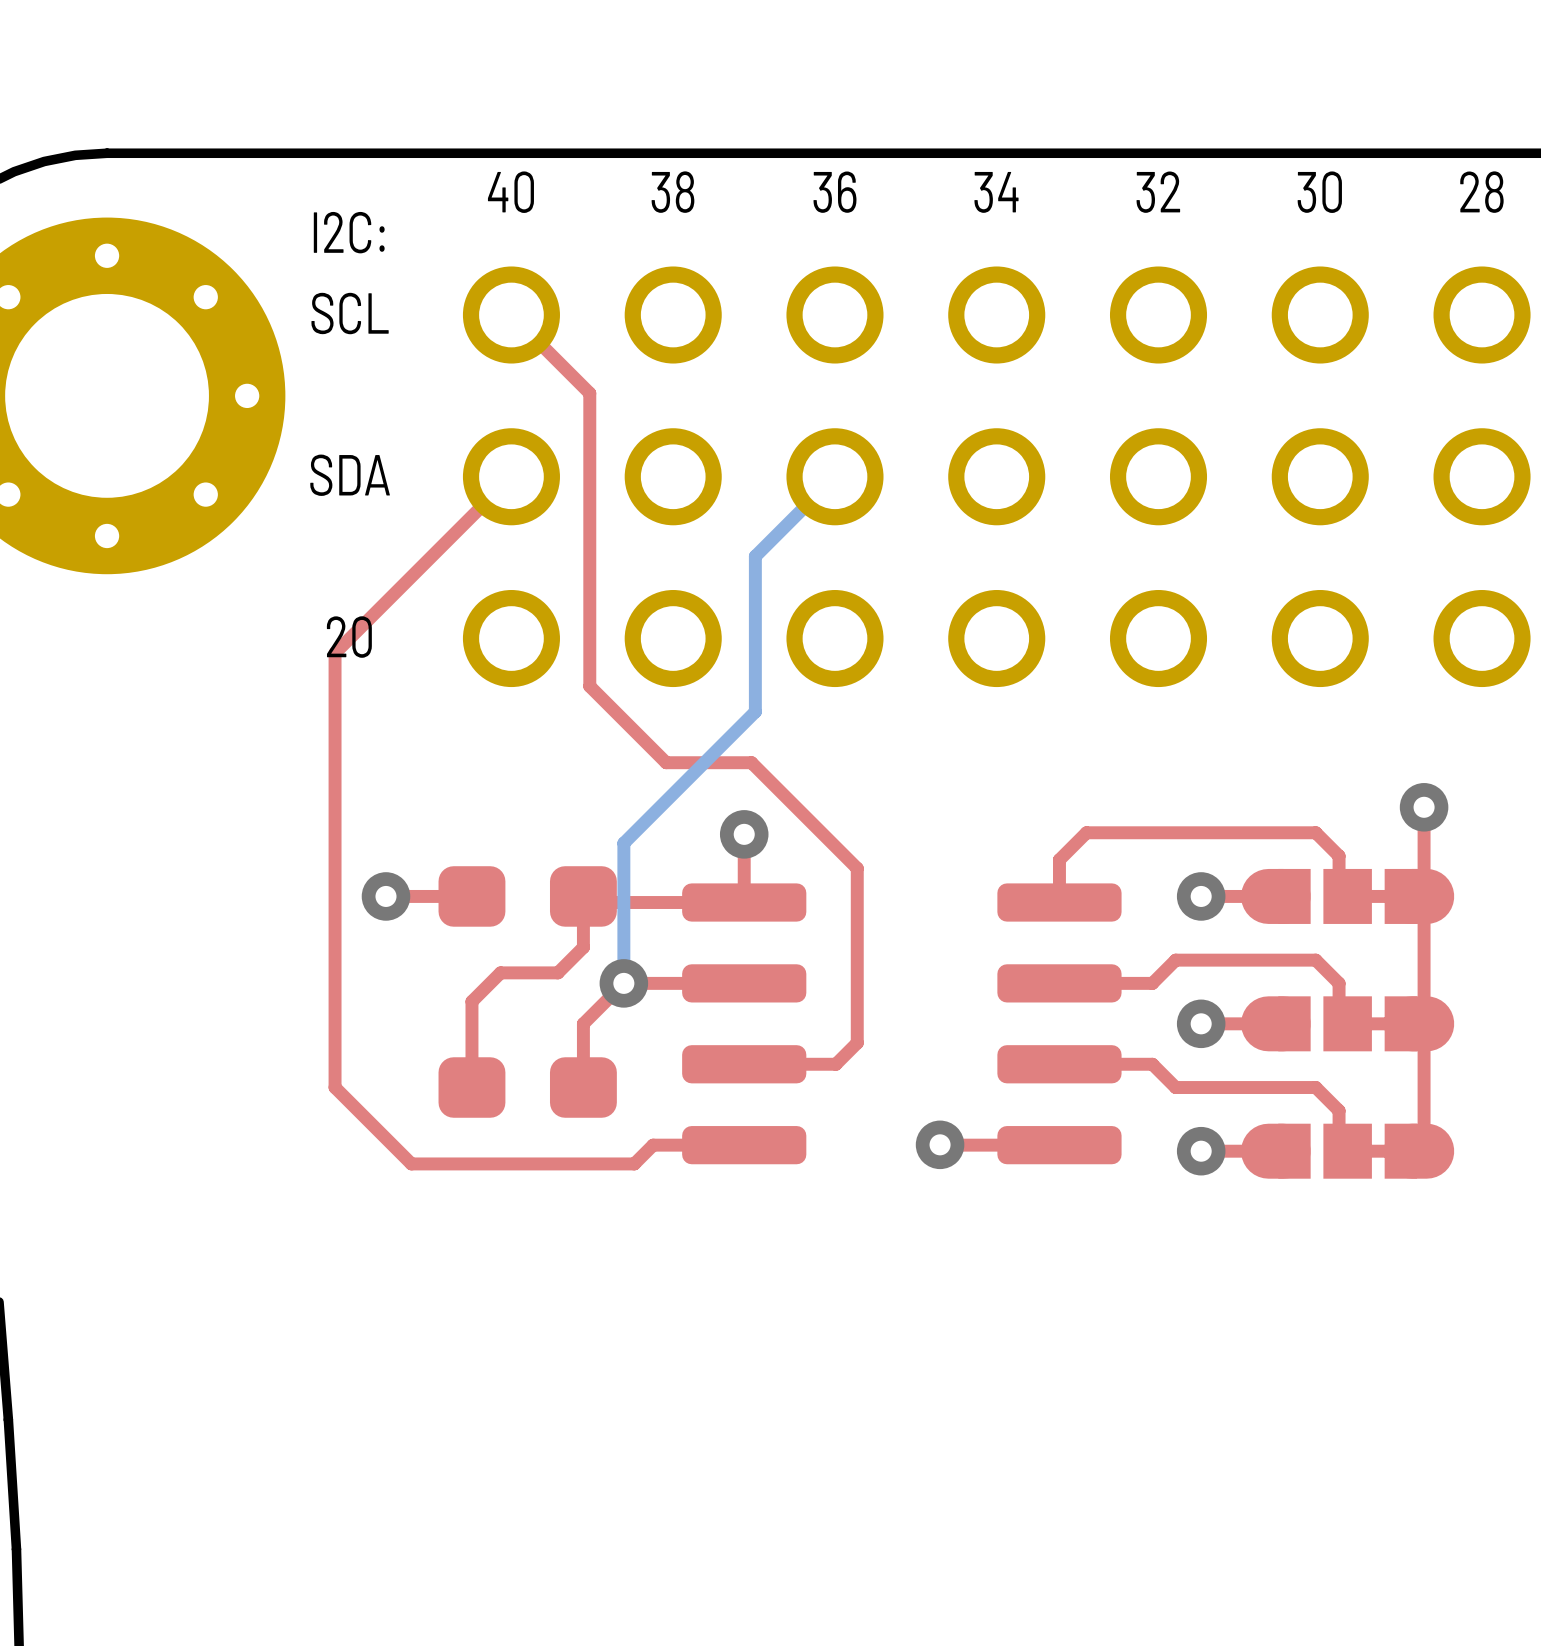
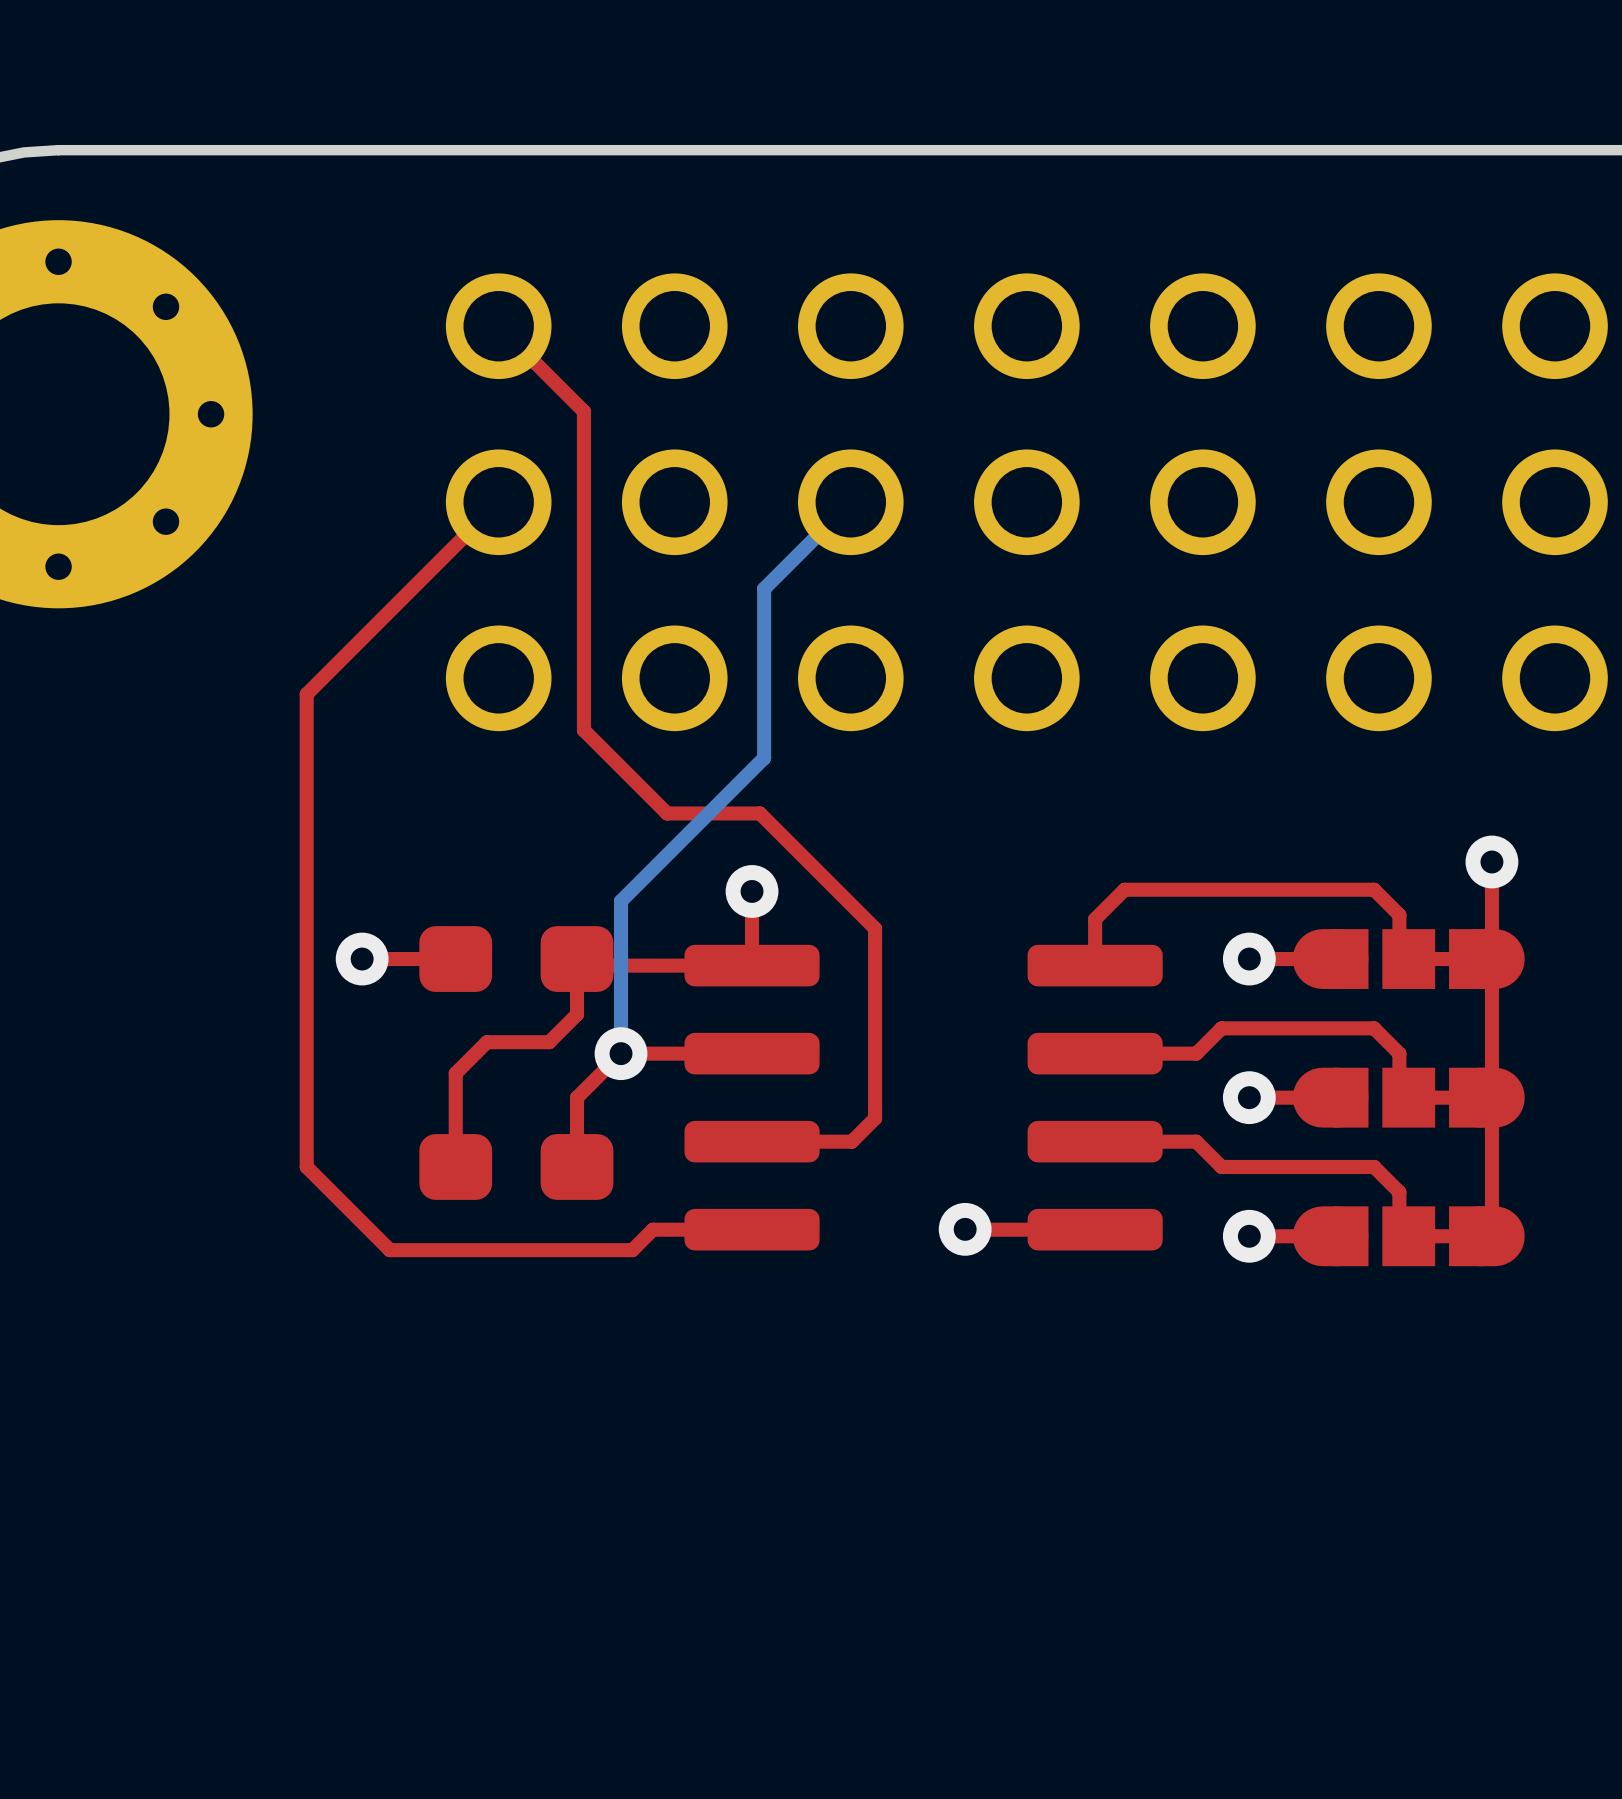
text: 40 (510, 192) -> none
text: 38 (672, 192) -> none
text: 36 (834, 192) -> none
text: 34 (996, 192) -> none
text: 32 (1158, 192) -> none
text: 30 (1319, 192) -> none
text: 28 (1481, 192) -> none
text: I2C: (349, 232) -> none
text: SCL (350, 313) -> none
text: SDA (350, 475) -> none
text: 20 (349, 637) -> none

